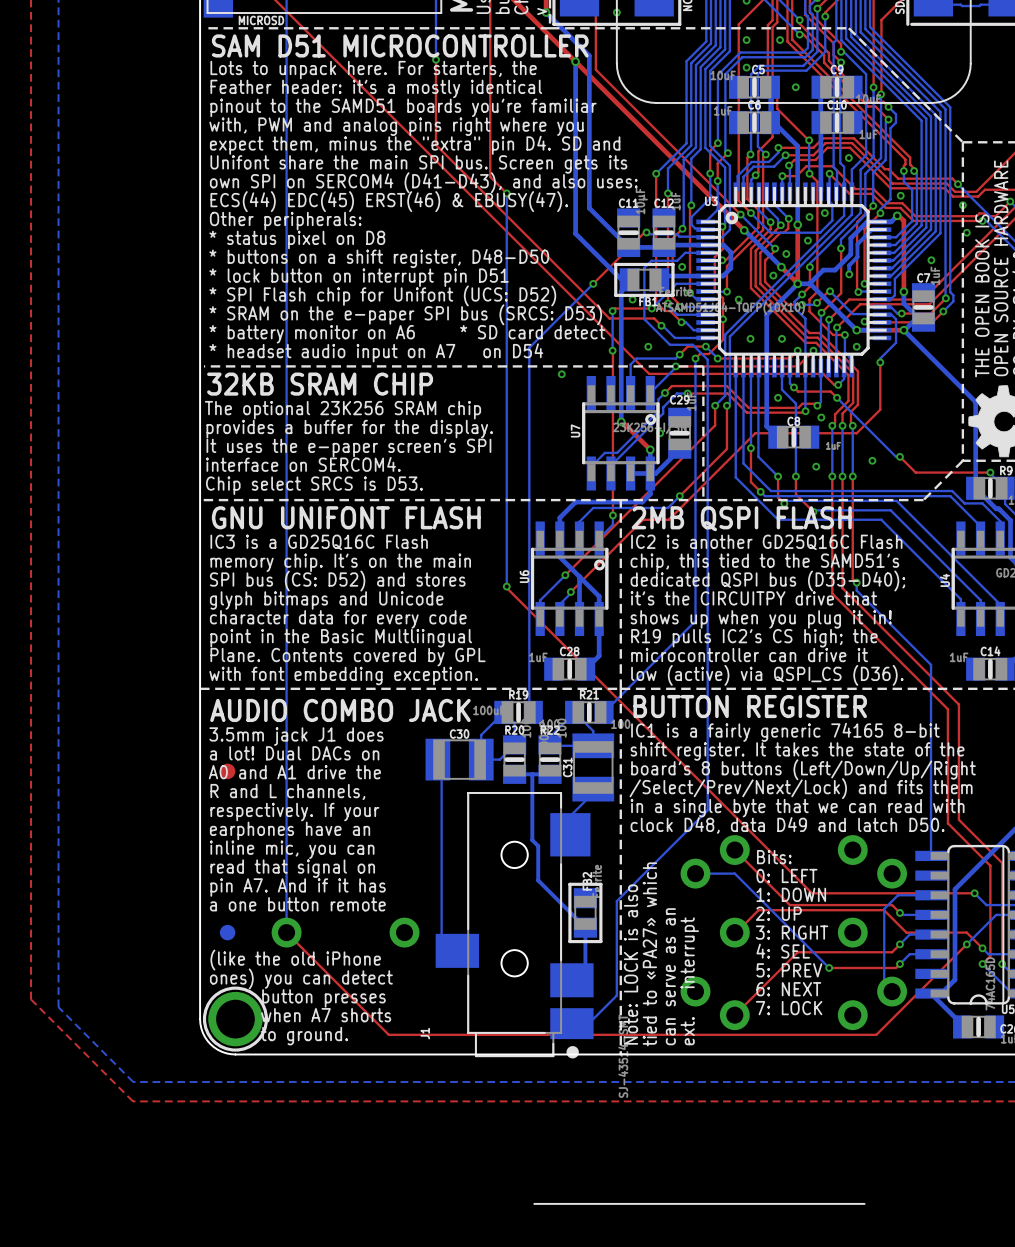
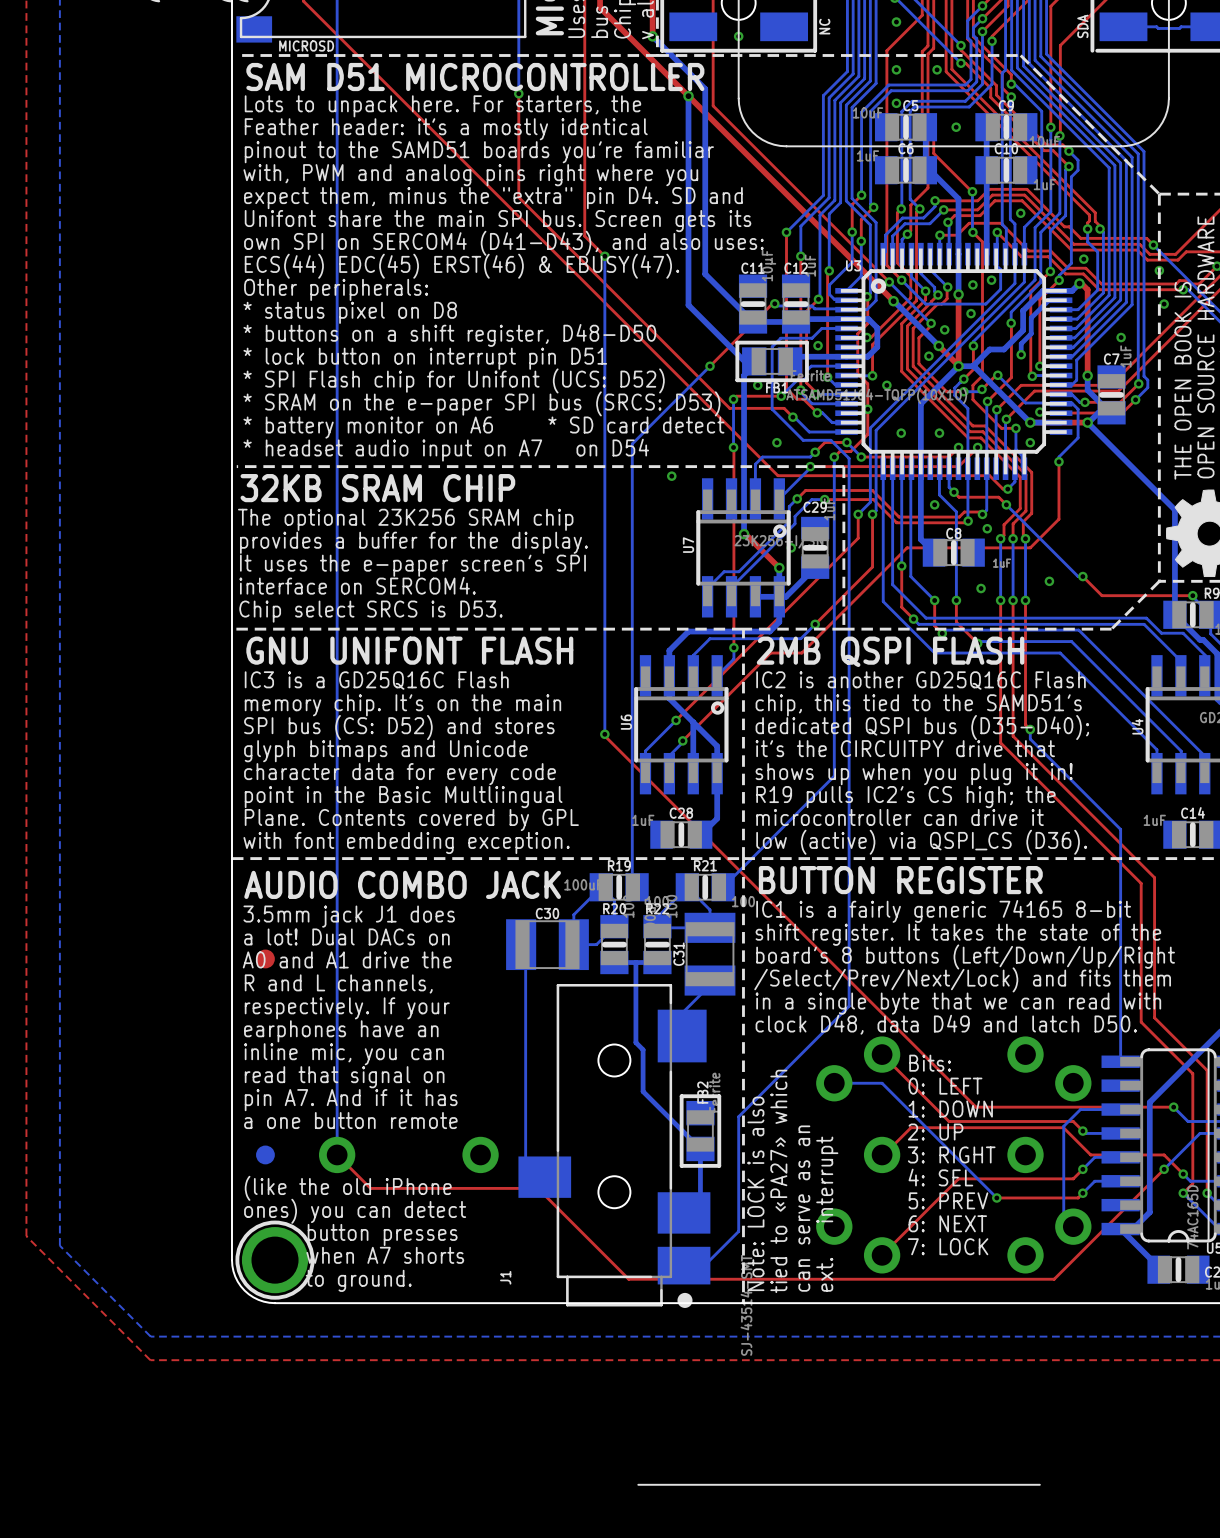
top track: (314, 960) (388, 1034) (526, 1034) -> (370, 1188) (537, 1188) (628, 1279)

